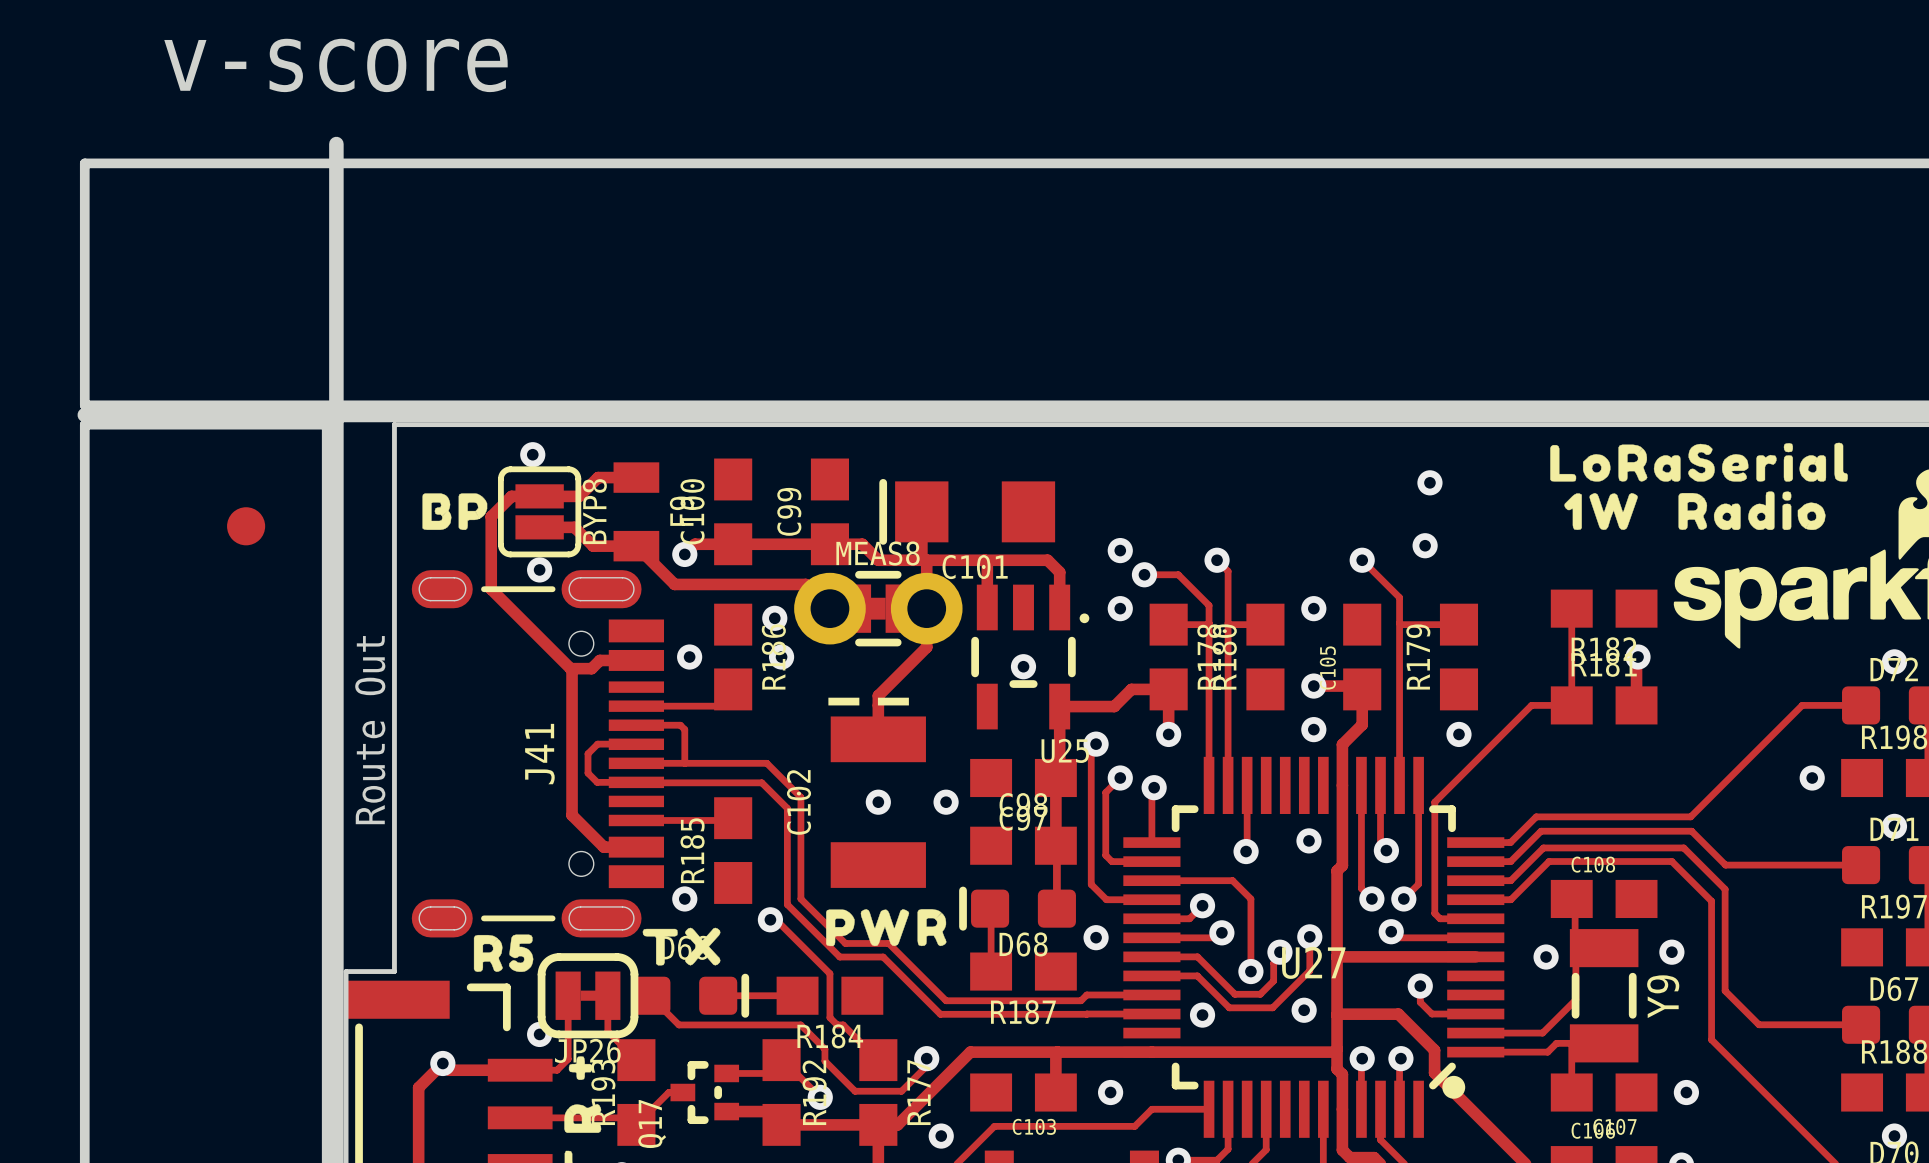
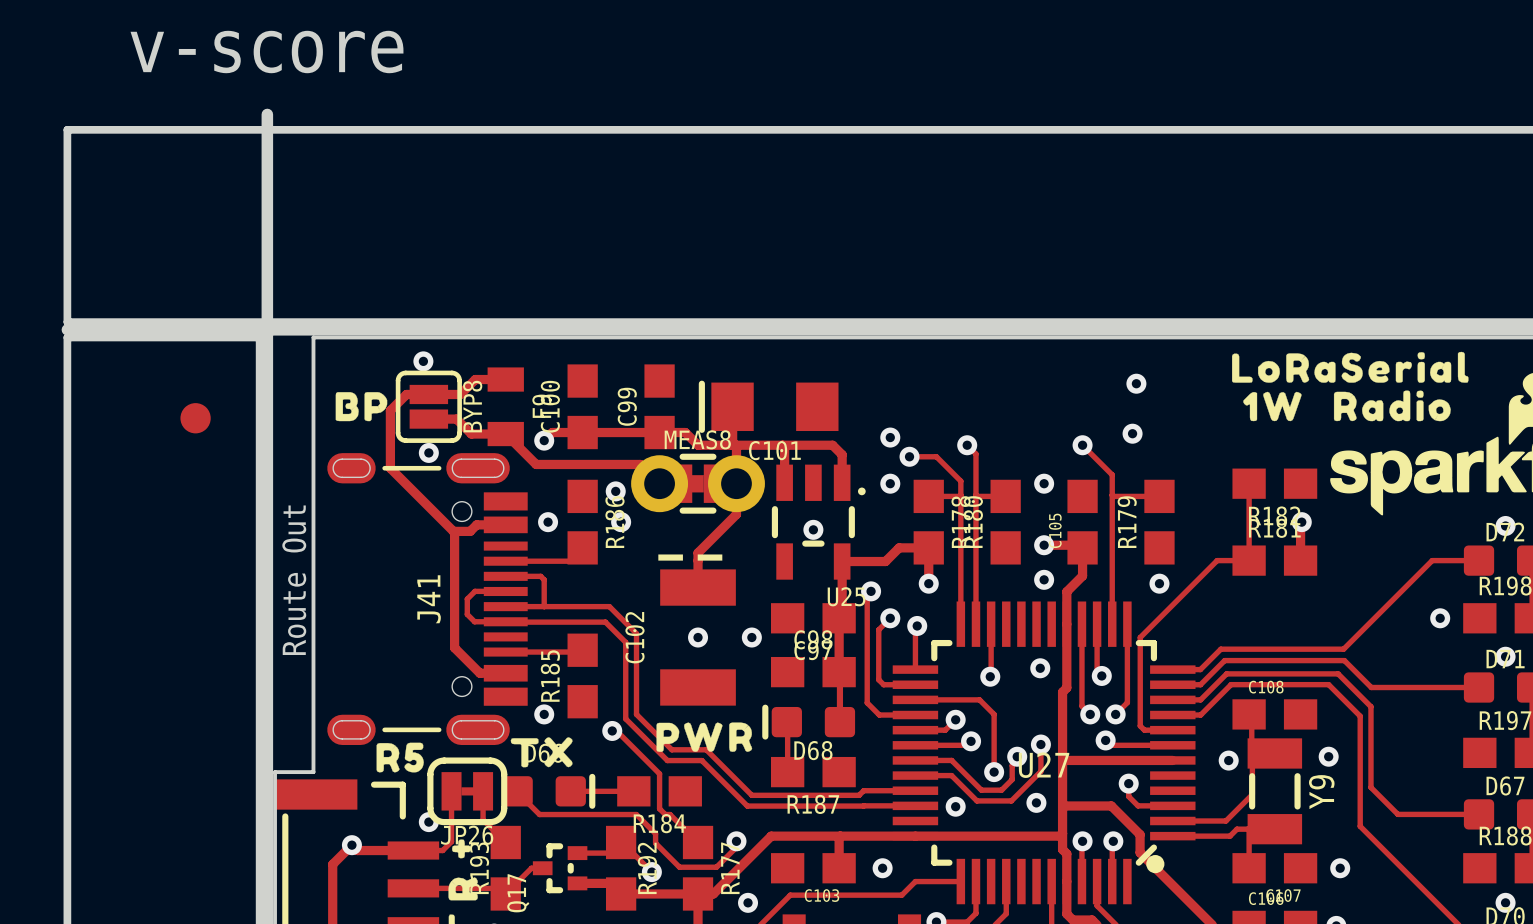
via: (1096, 937) -> none

